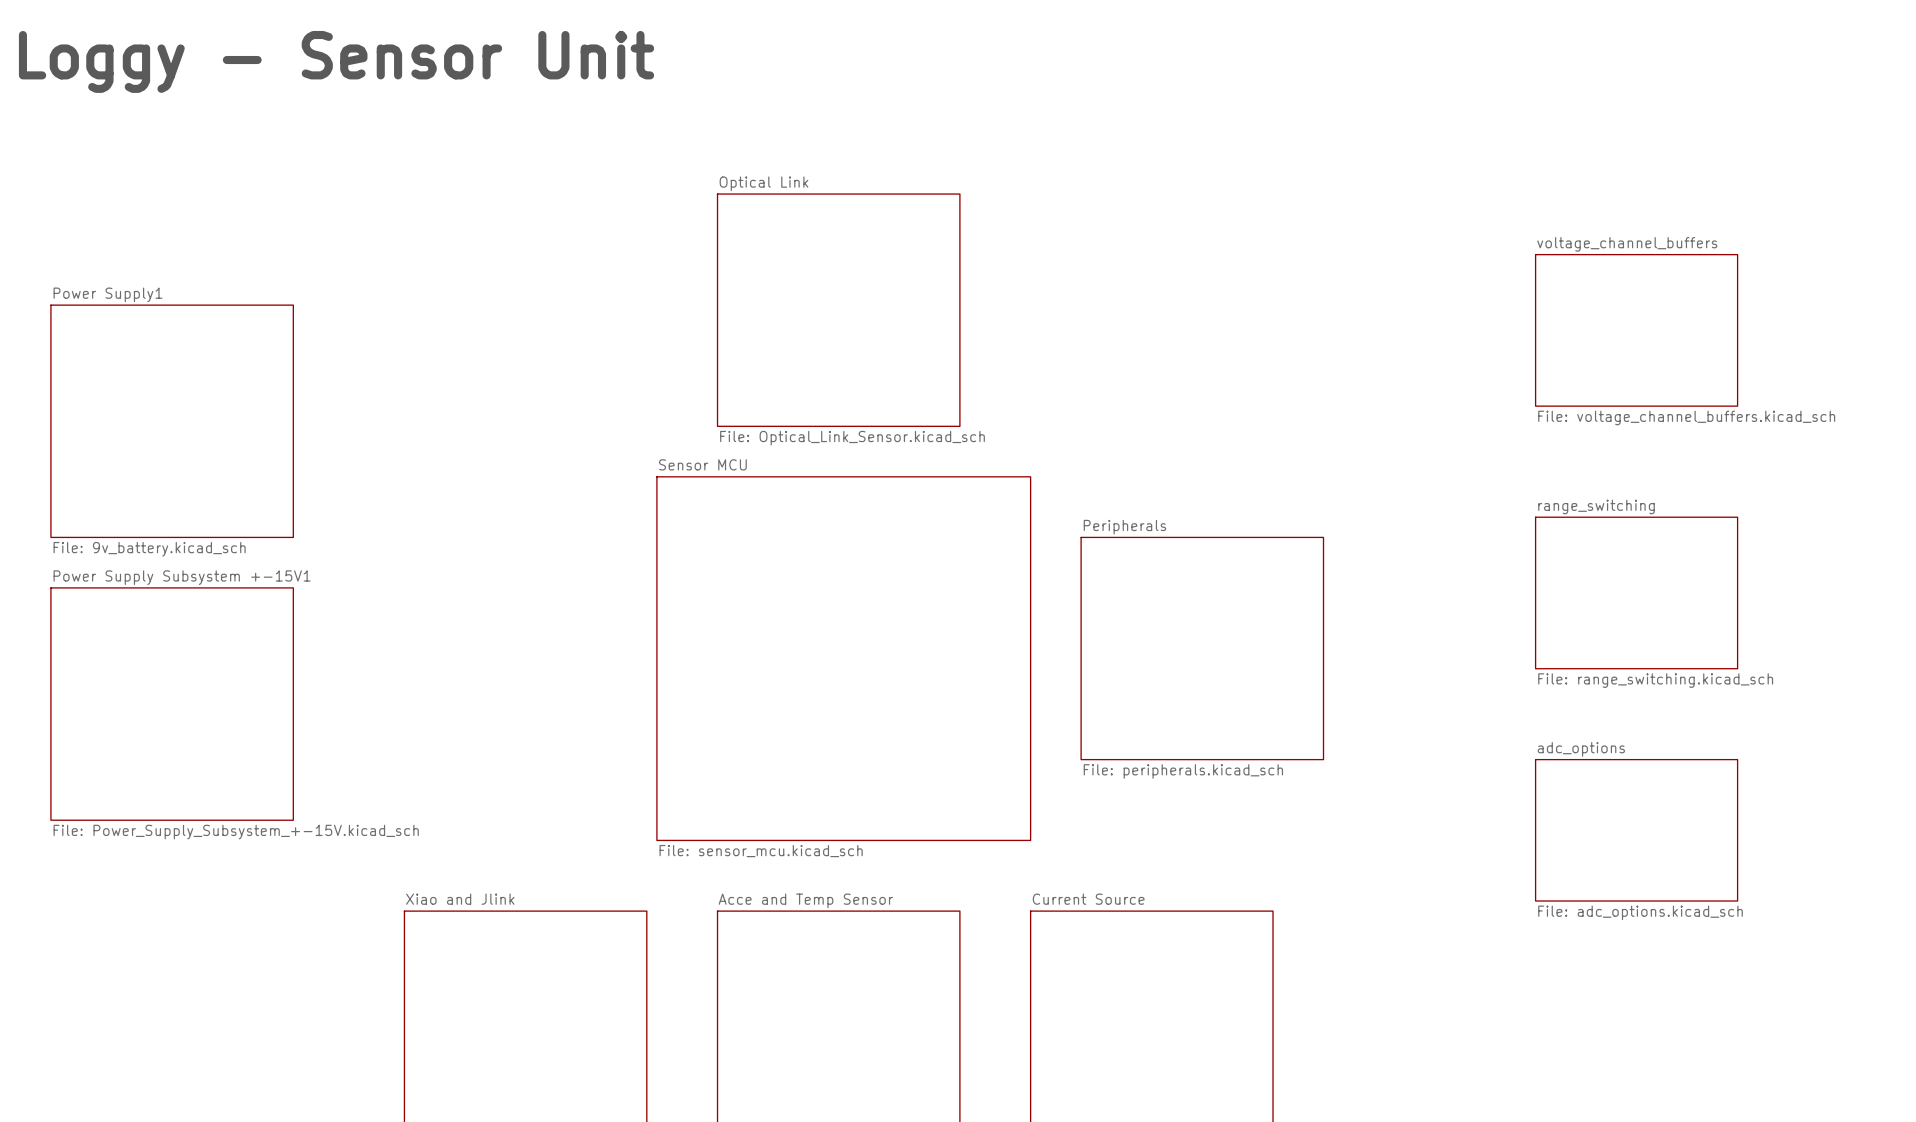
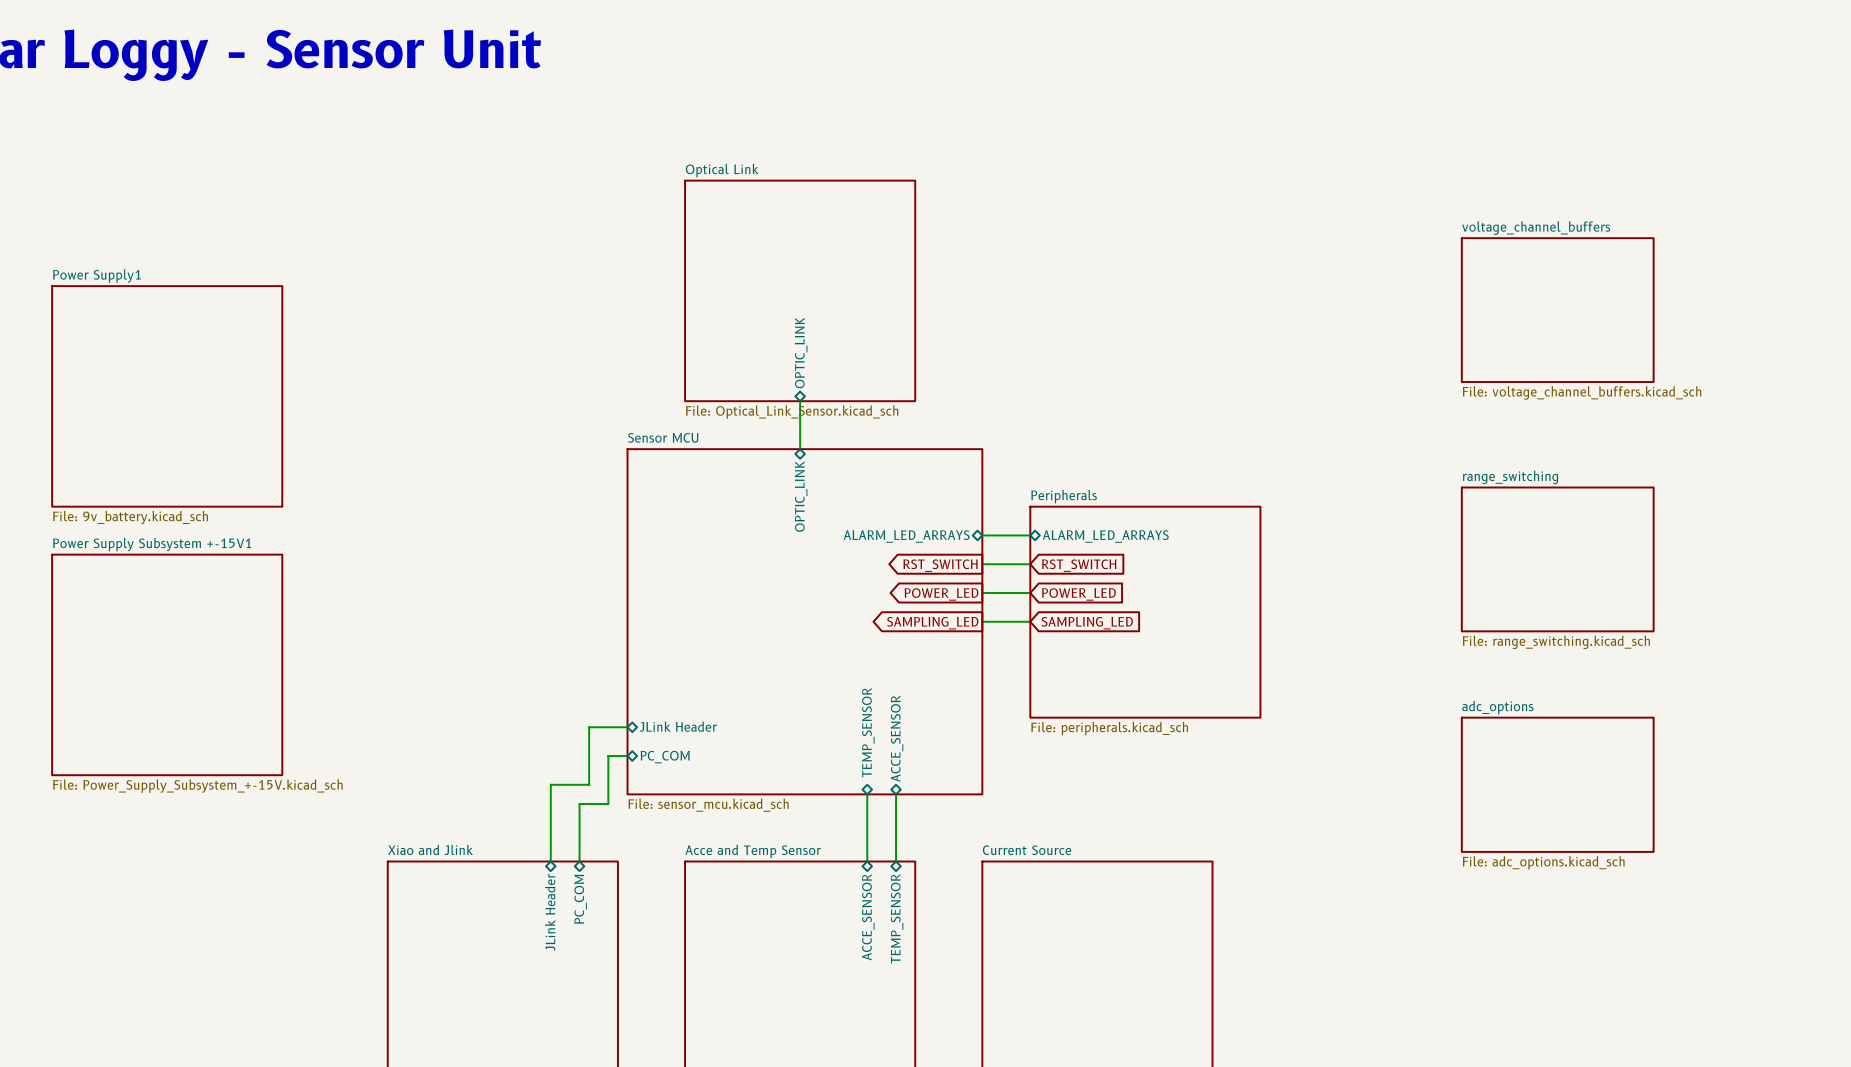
sheet pin: none -> OPTIC_LINK (801, 353)
wire: none -> (800, 401) (800, 449)
sheet pin: none -> OPTIC_LINK (801, 496)
sheet pin: none -> ALARM_LED_ARRAYS (906, 536)
wire: none -> (982, 535) (1030, 535)
sheet pin: none -> ALARM_LED_ARRAYS (1105, 536)
global label: none -> RST_SWITCH (940, 565)
wire: none -> (982, 564) (1030, 564)
global label: none -> RST_SWITCH (1079, 565)
global label: none -> POWER_LED (941, 594)
wire: none -> (982, 592) (1030, 592)
global label: none -> POWER_LED (1078, 594)
wire: none -> (982, 621) (1030, 621)
global label: none -> SAMPLING_LED (932, 623)
global label: none -> SAMPLING_LED (1087, 623)
sheet pin: none -> TEMP_SENSOR (868, 732)
wire: none -> (627, 727) (589, 727) (589, 784) (550, 784) (550, 861)
sheet pin: none -> JLink Header (678, 726)
sheet pin: none -> ACCE_SENSOR (897, 738)
wire: none -> (627, 756) (608, 756) (608, 803) (579, 803) (579, 861)
sheet pin: none -> PC_COM (665, 757)
wire: none -> (867, 794) (867, 861)
wire: none -> (896, 794) (896, 861)
sheet pin: none -> PC_COM (580, 899)
sheet pin: none -> JLink Header (550, 912)
sheet pin: none -> ACCE_SENSOR (868, 917)
sheet pin: none -> TEMP_SENSOR (897, 918)

